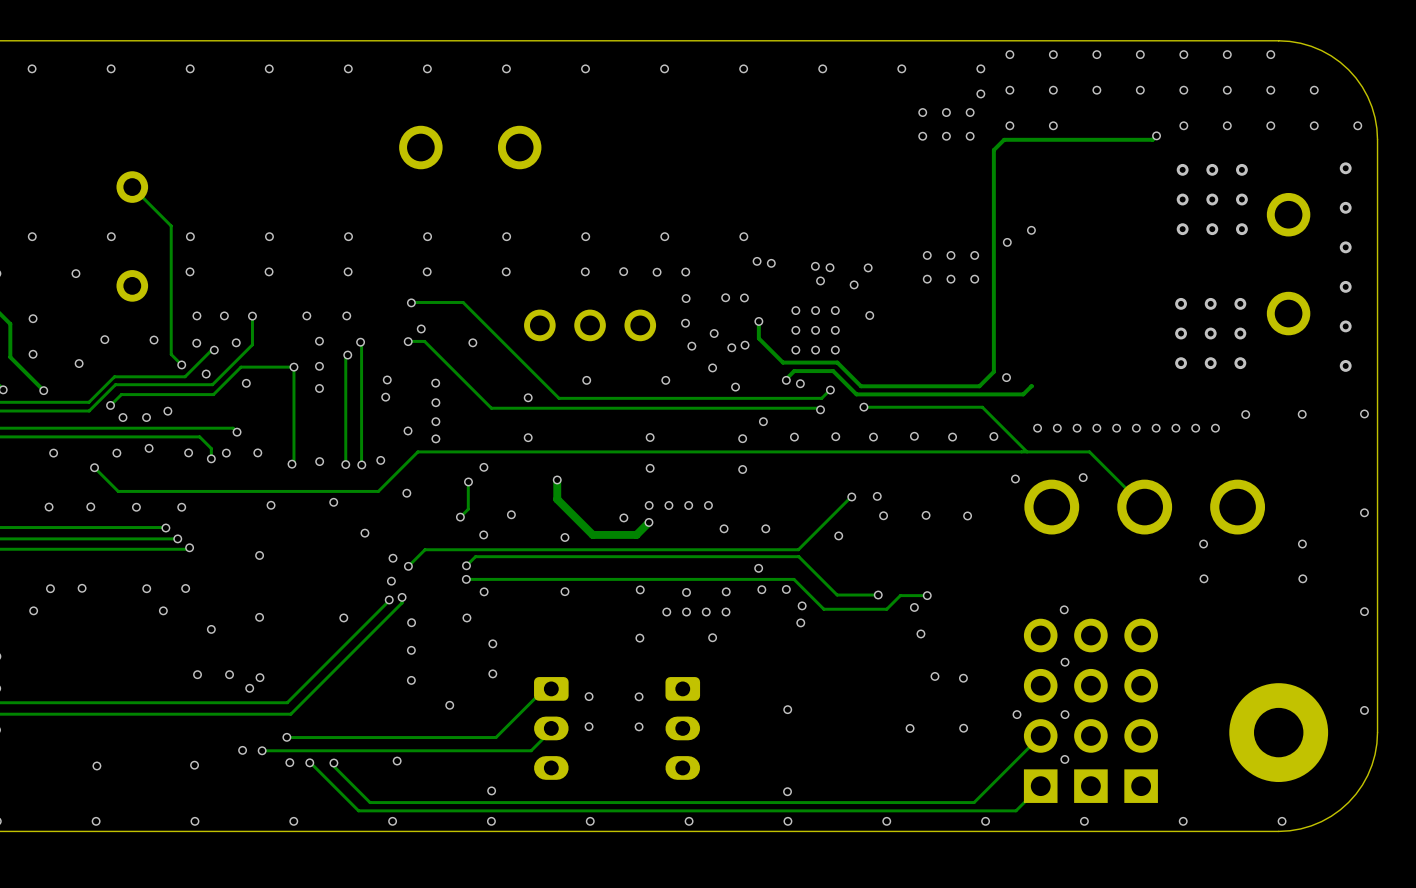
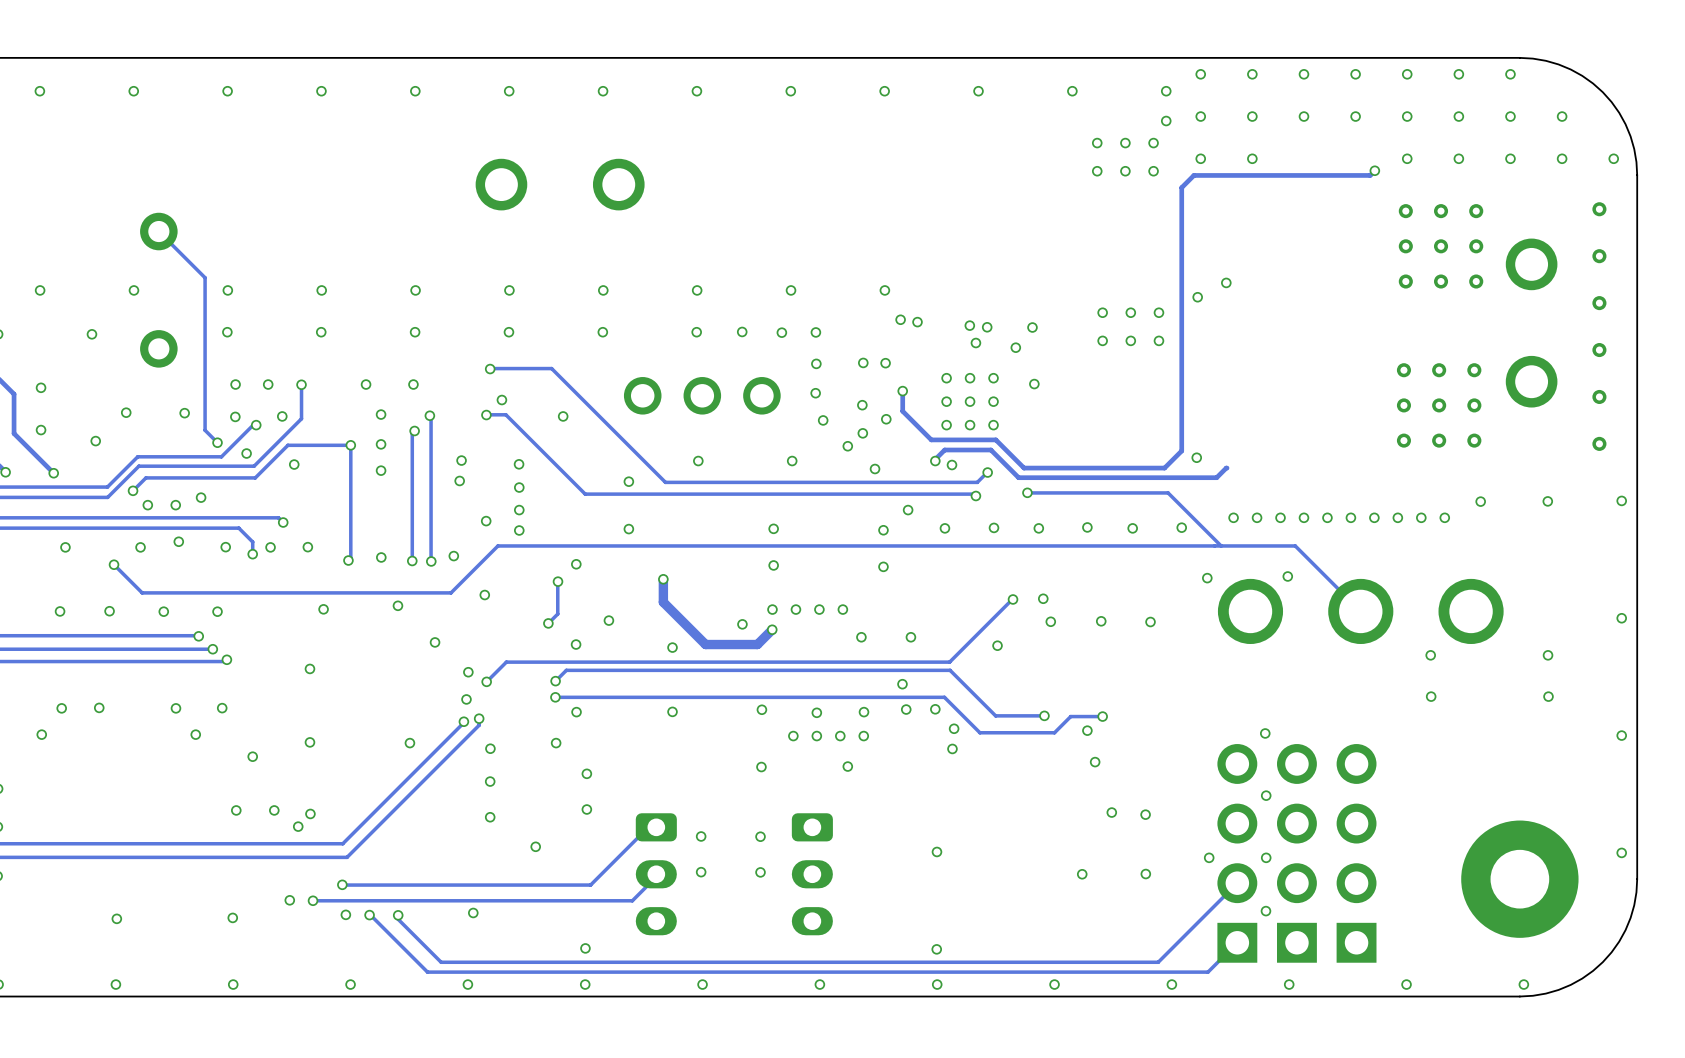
via: (714, 333) -> none
via: none -> (862, 405)
via: (731, 347) -> none
via: none -> (862, 433)

